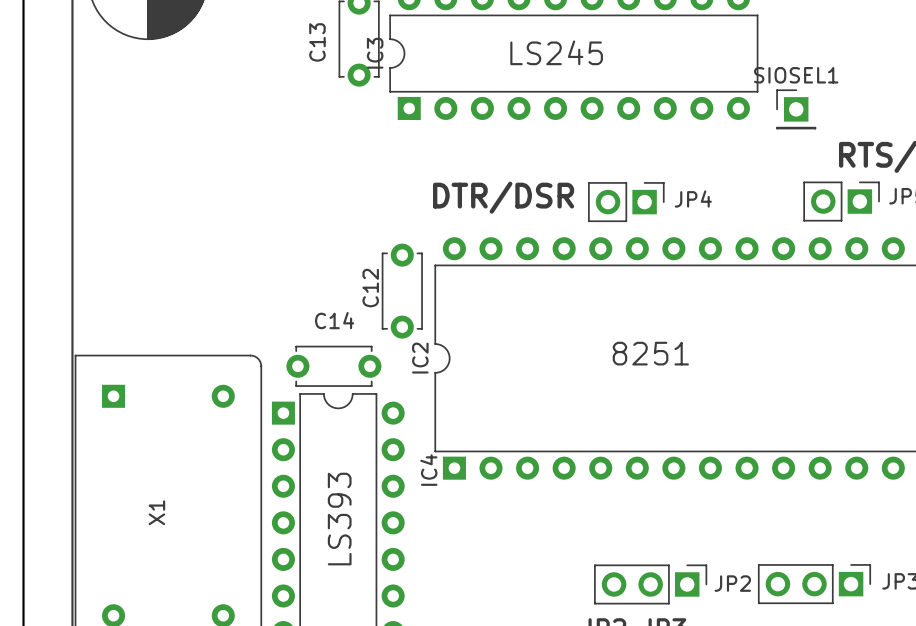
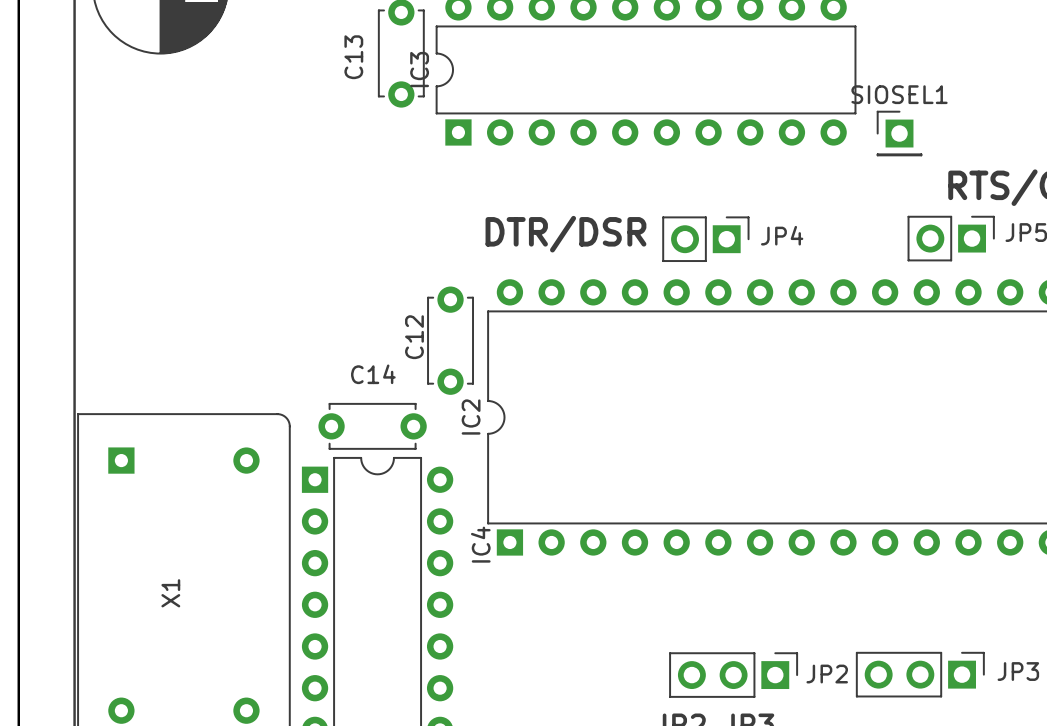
text: LS245 (556, 52) -> none
text: 8251 (650, 353) -> none
text: LS393 (339, 519) -> none

